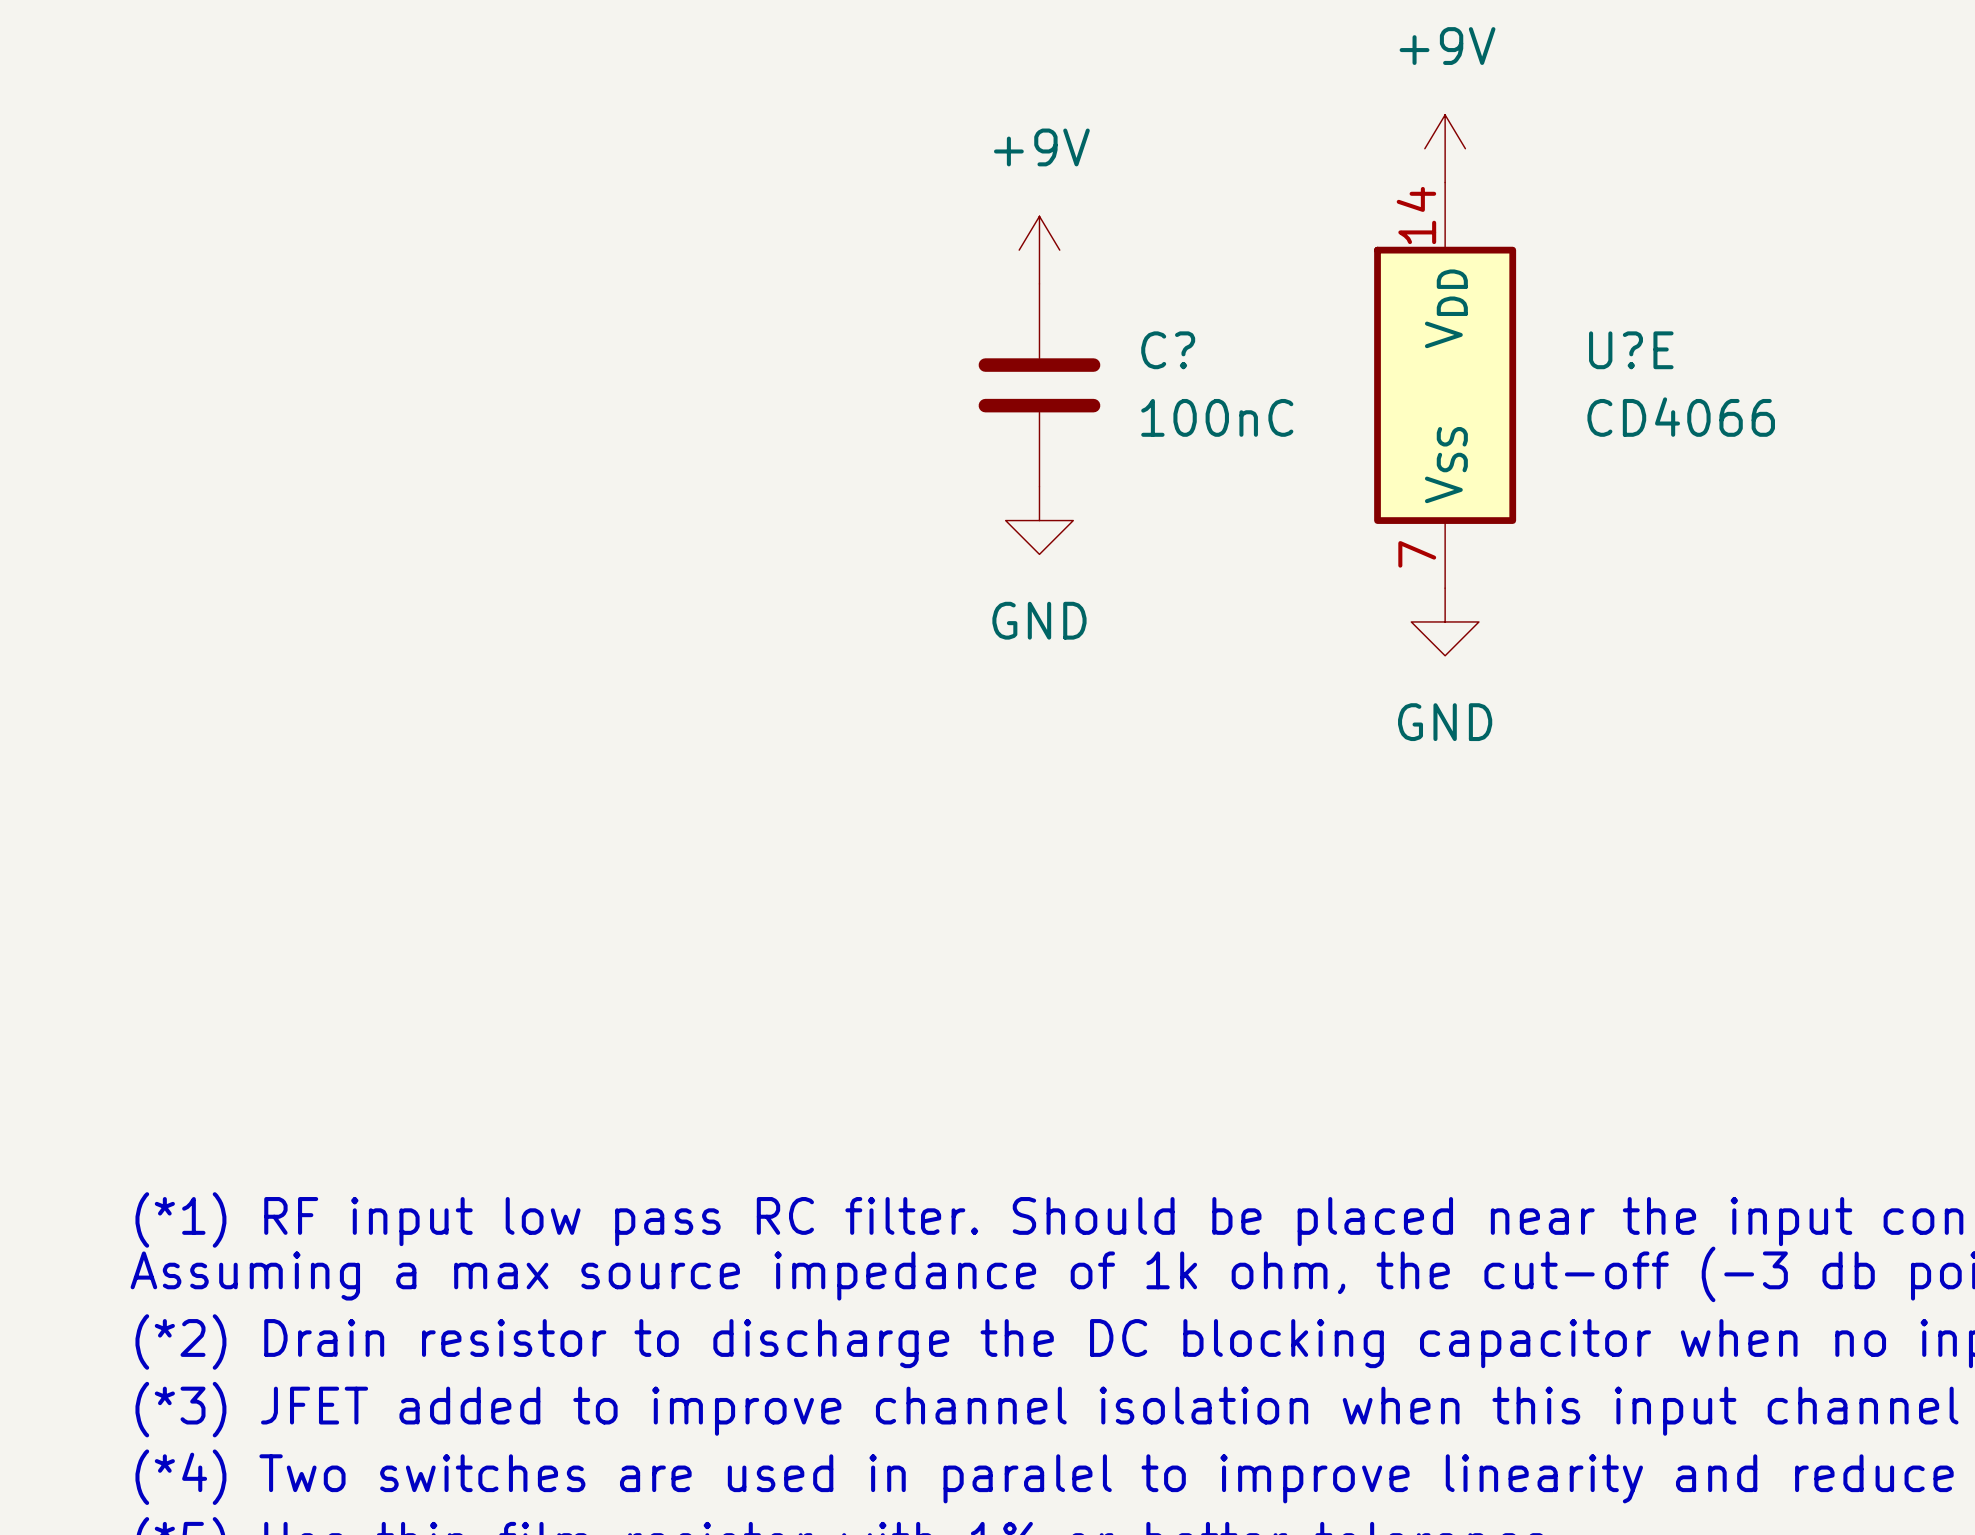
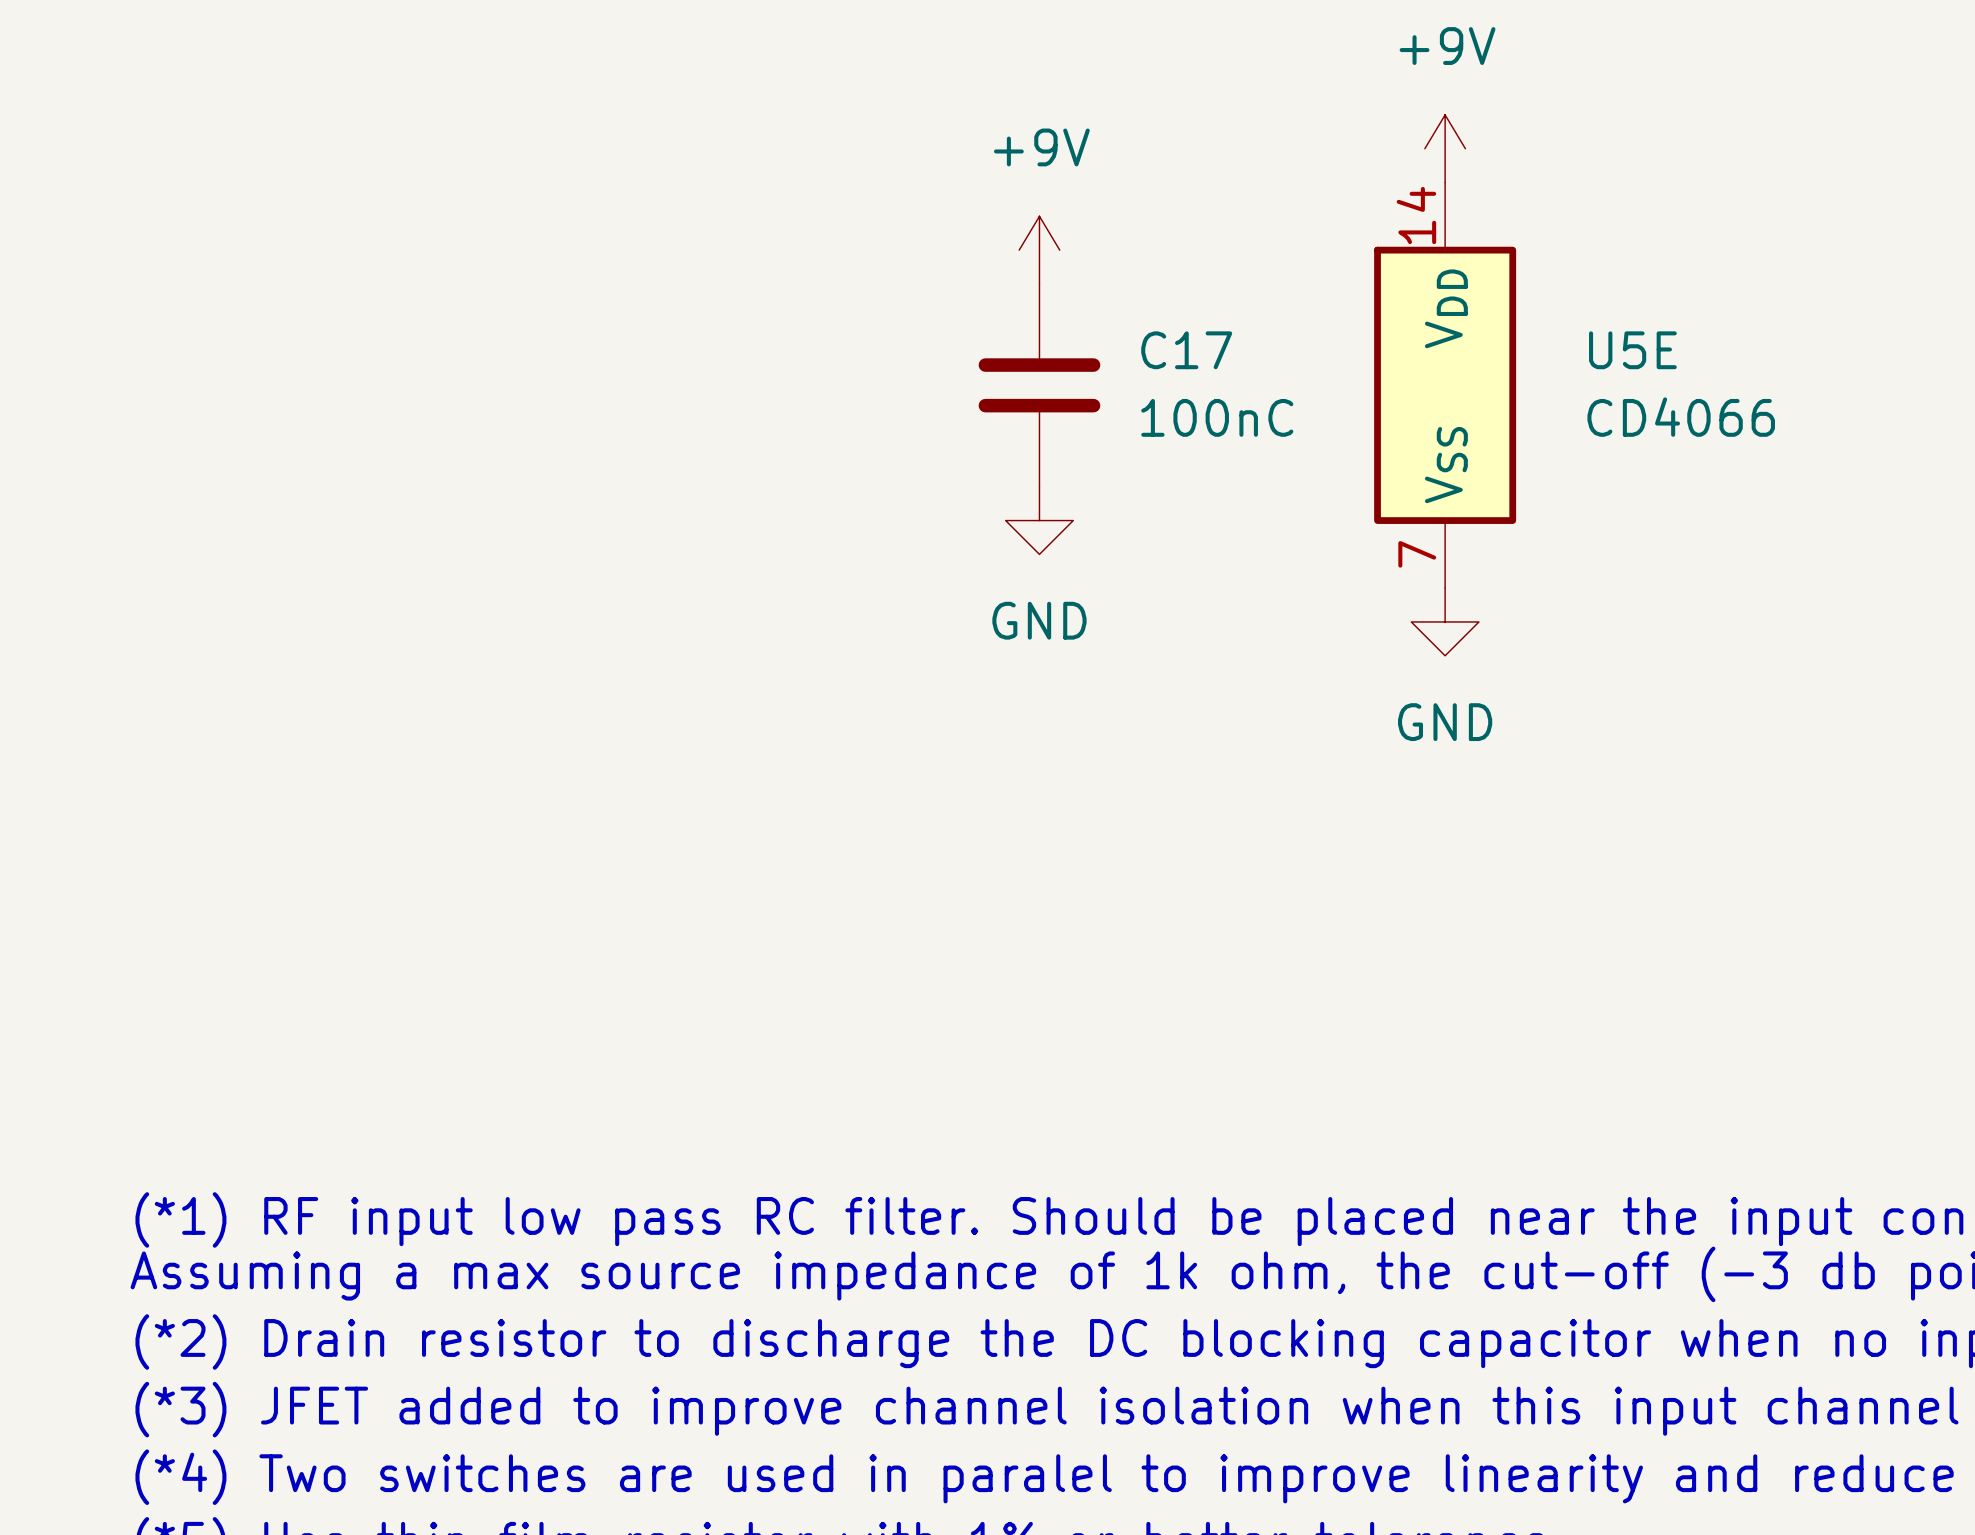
C? name: C? (1168, 350) -> C17 (1186, 350)
U?E name: U?E (1631, 350) -> U5E (1632, 350)

